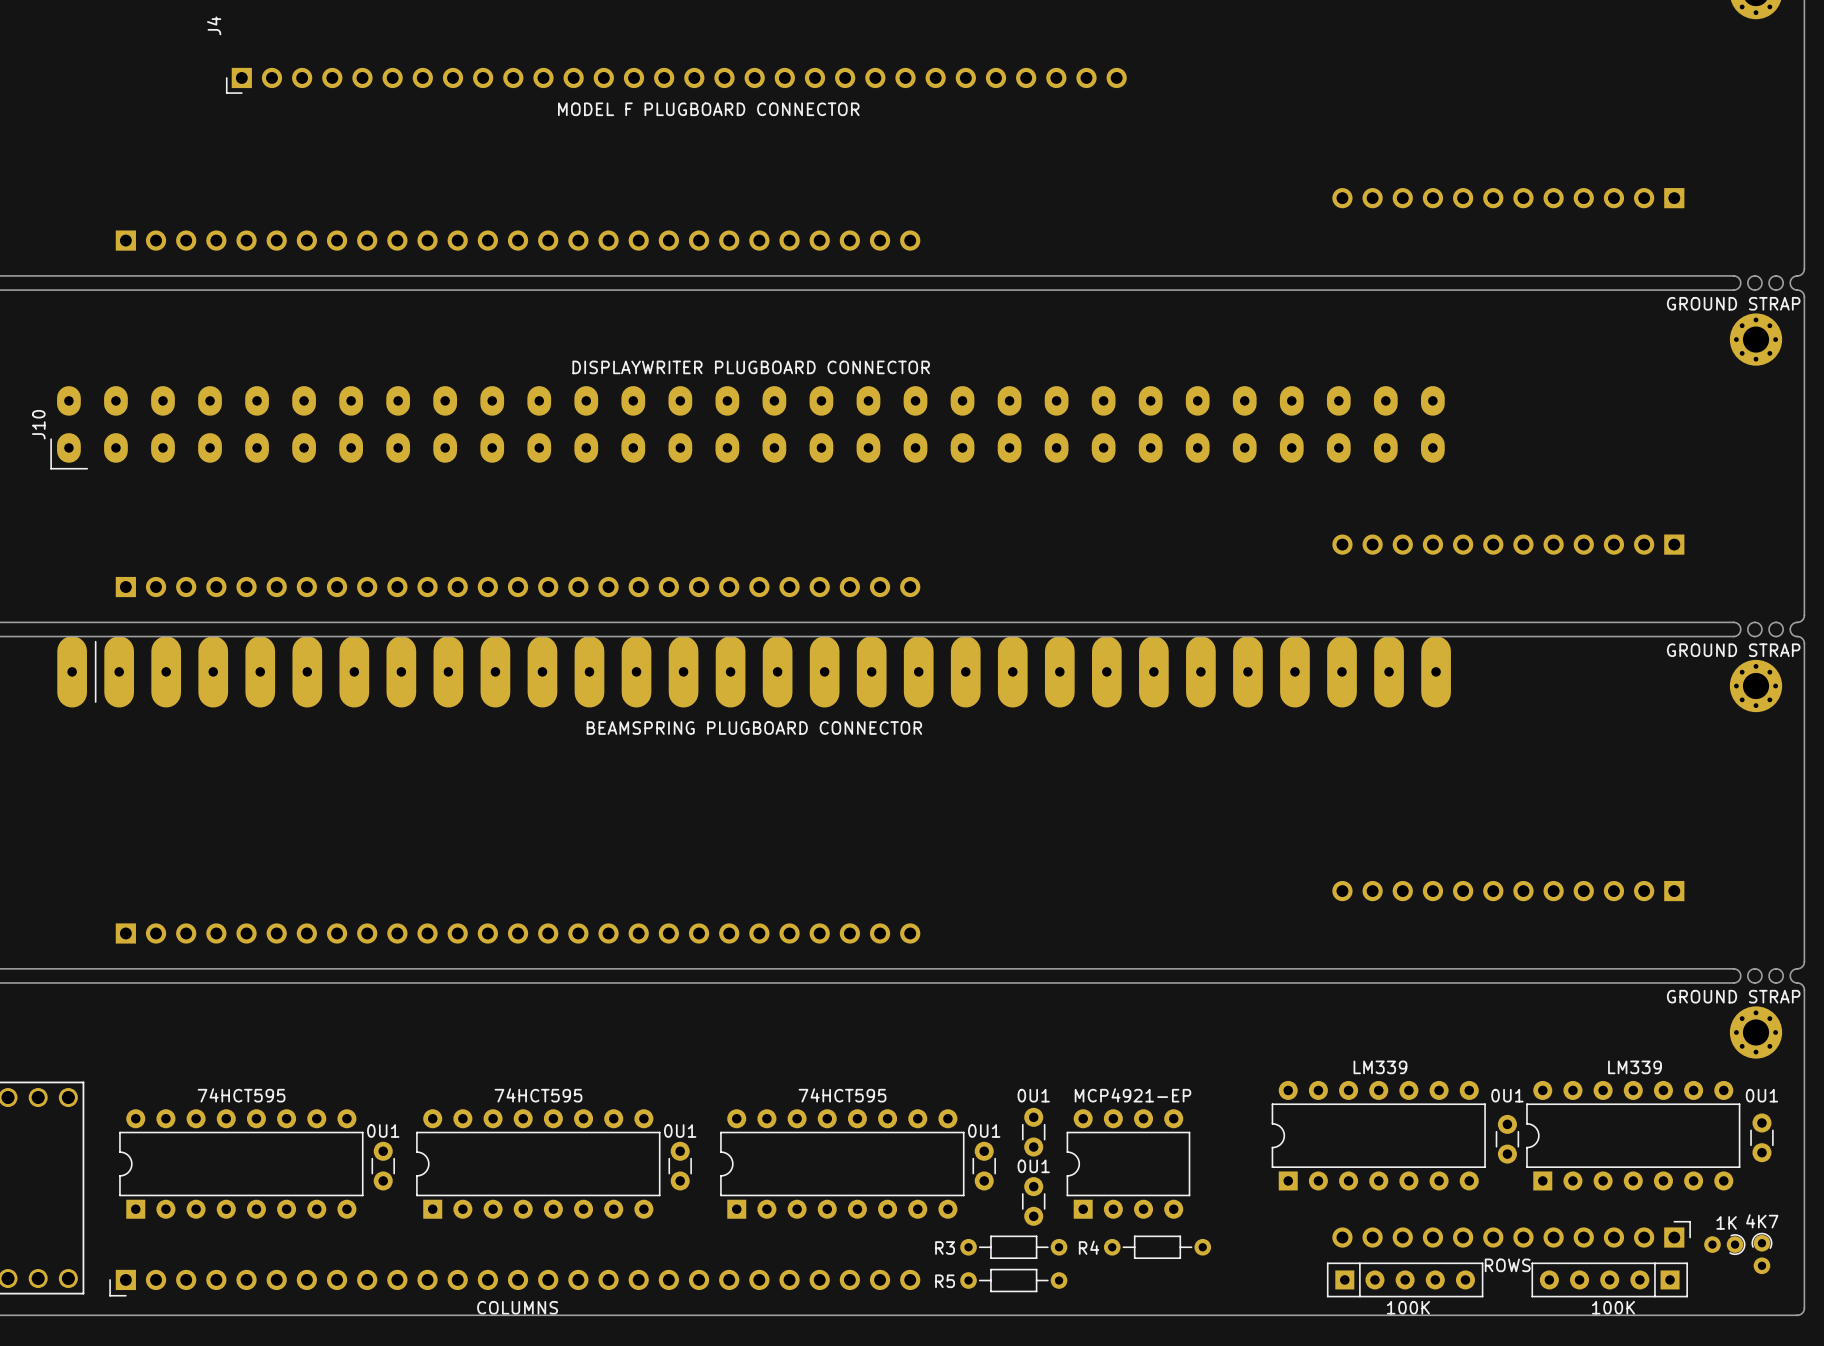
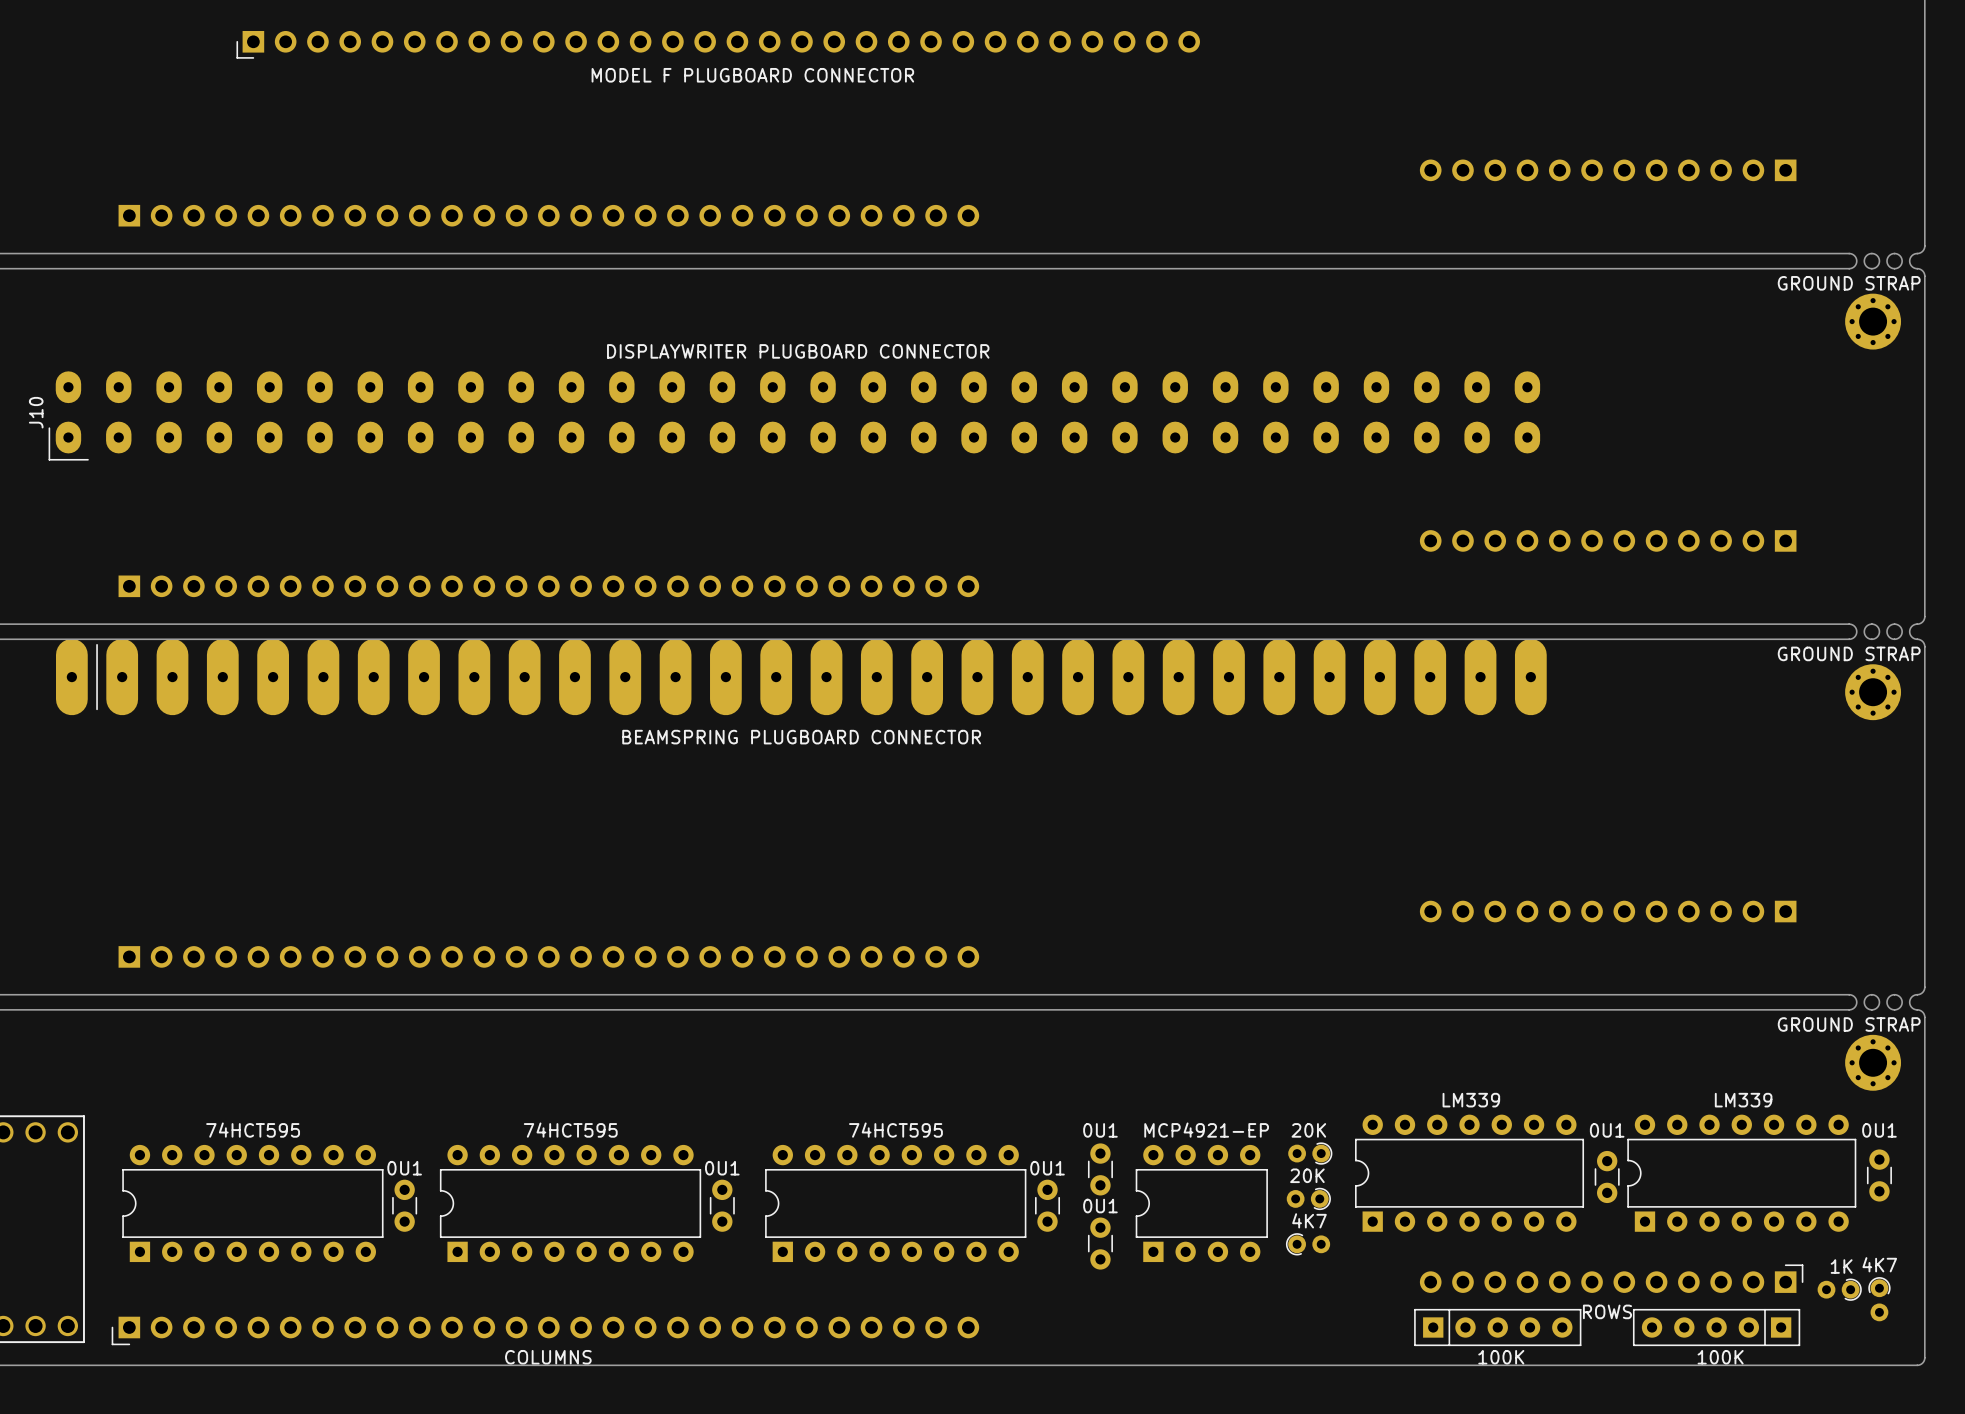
part: none -> 20K (1310, 1153)
part: none -> 20K (1308, 1198)
part: none -> 4K7 (1308, 1244)
R3: (1013, 1247) -> none
R4: (1157, 1247) -> none
R5: (1013, 1280) -> none

